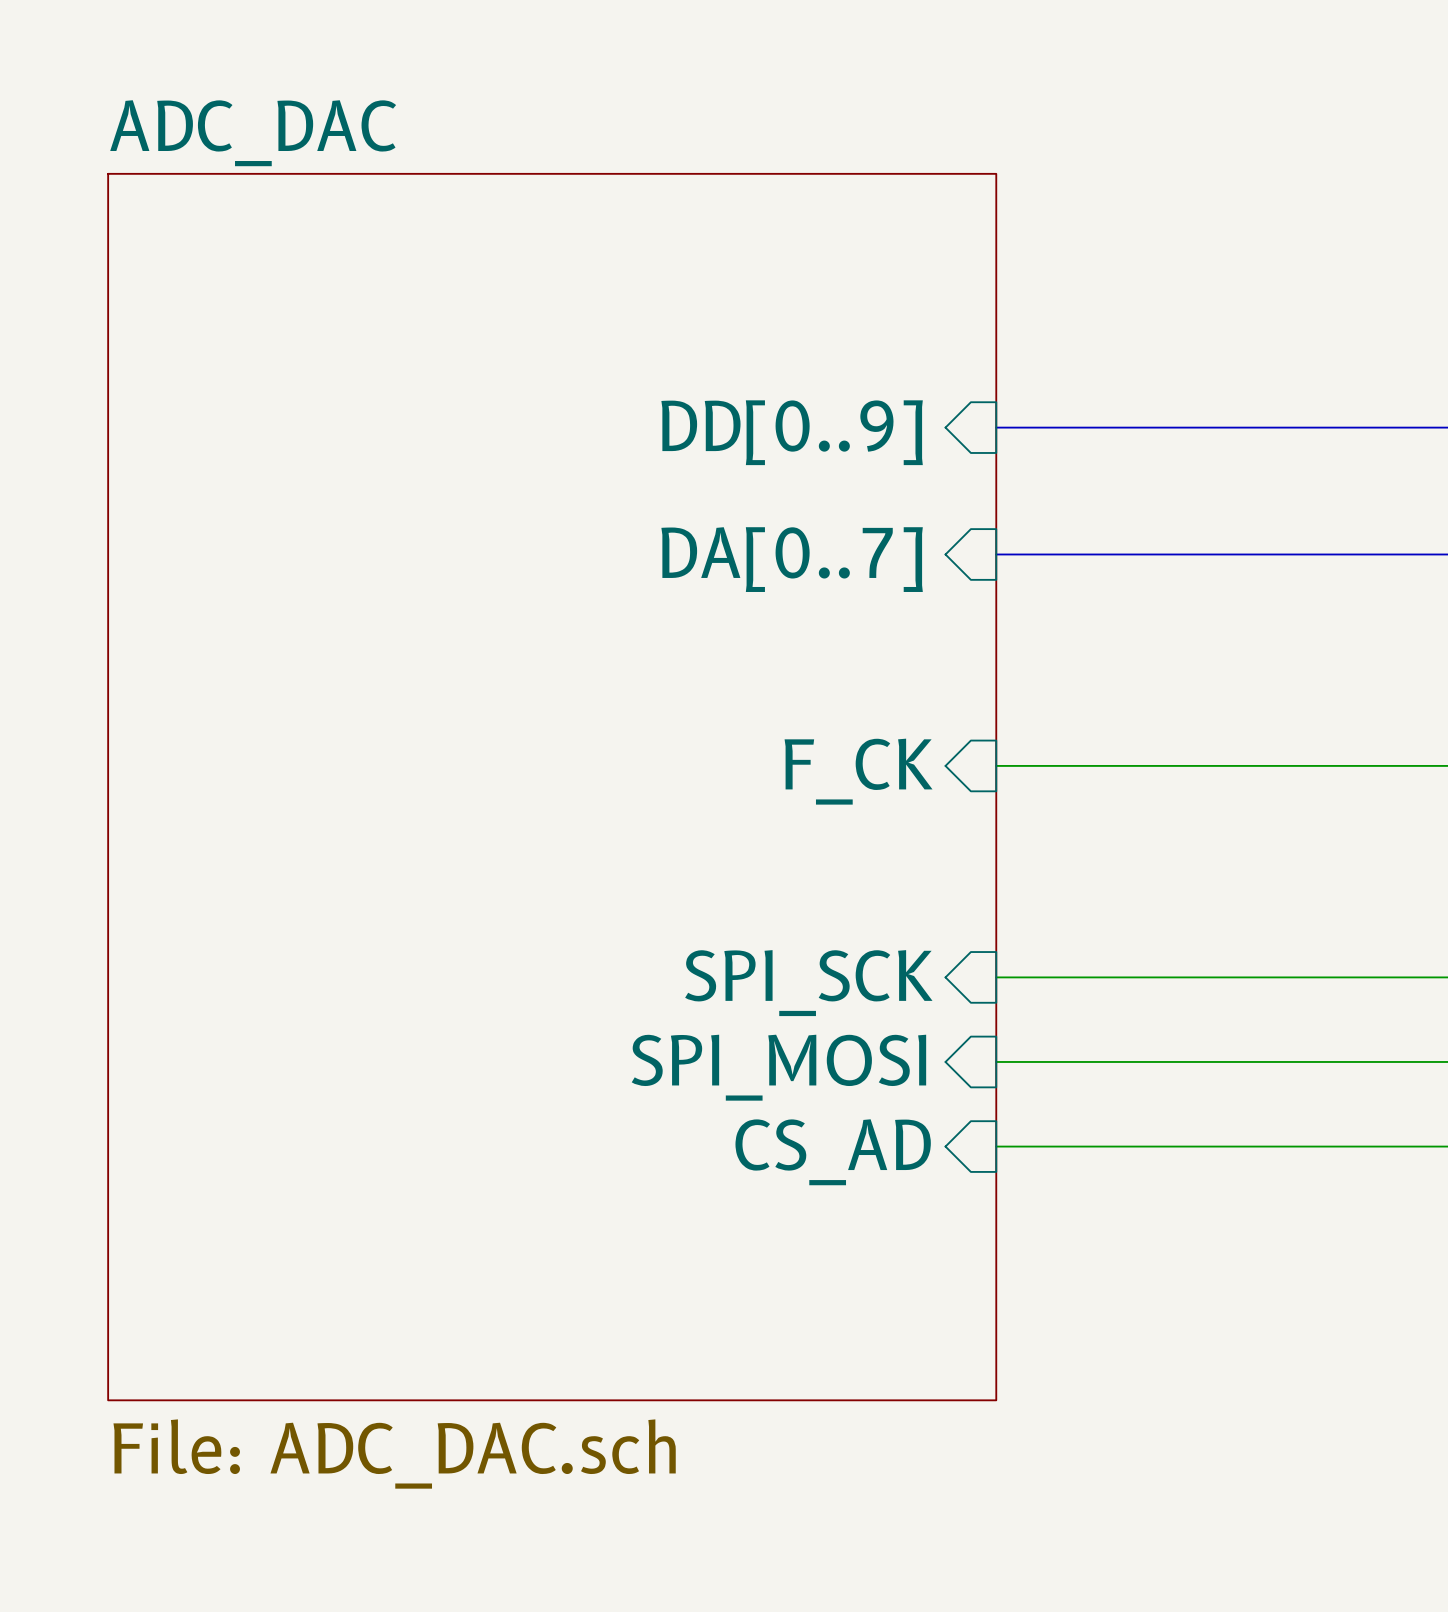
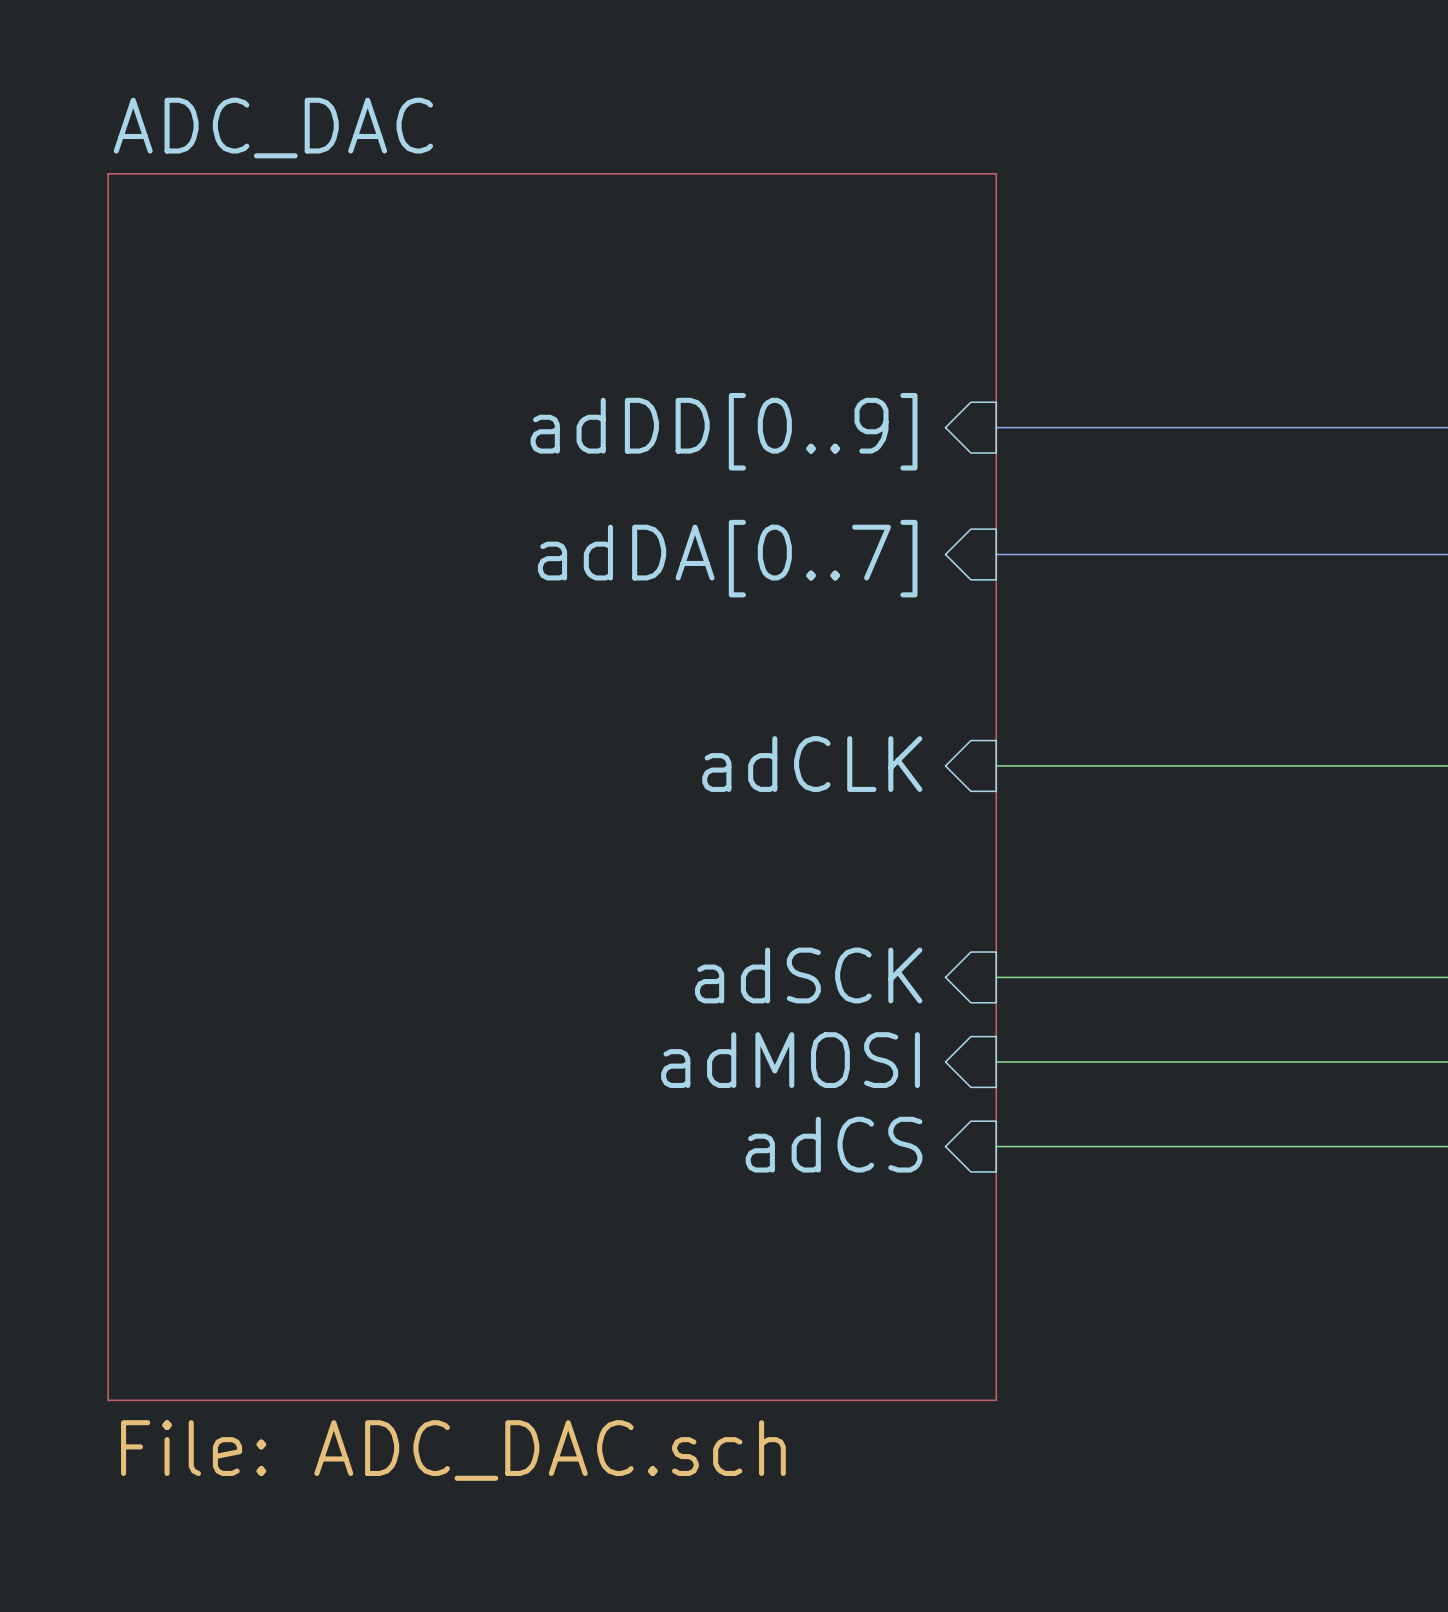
sheet pin: DD[0..9] (792, 432) -> adDD[0..9] (724, 431)
sheet pin: DA[0..7] (792, 559) -> adDA[0..7] (727, 558)
sheet pin: F_CK (858, 771) -> adCLK (812, 764)
sheet pin: SPI_SCK (808, 983) -> adSCK (808, 975)
sheet pin: SPI_MOSI (778, 1067) -> adMOSI (790, 1060)
sheet pin: CS_AD (833, 1152) -> adCS (834, 1144)

